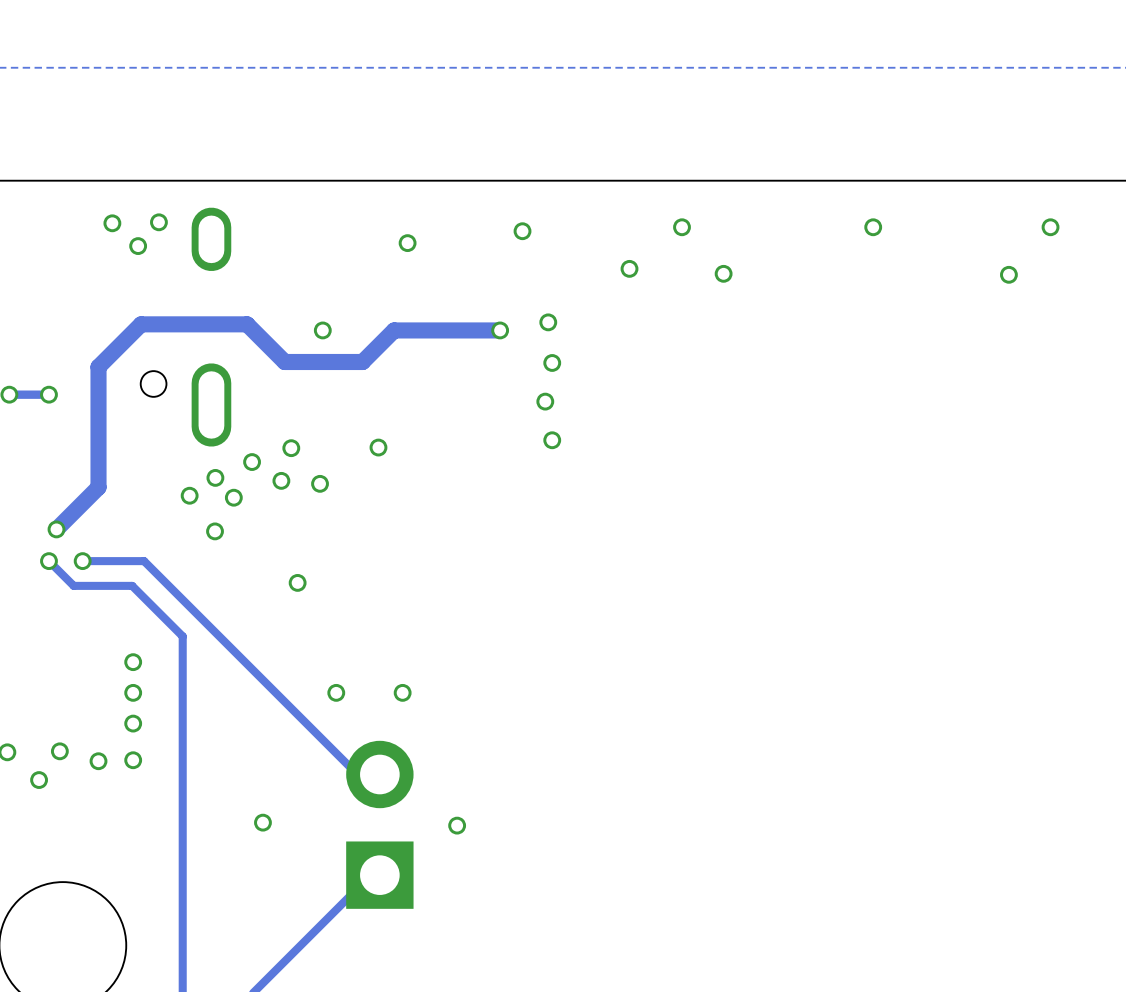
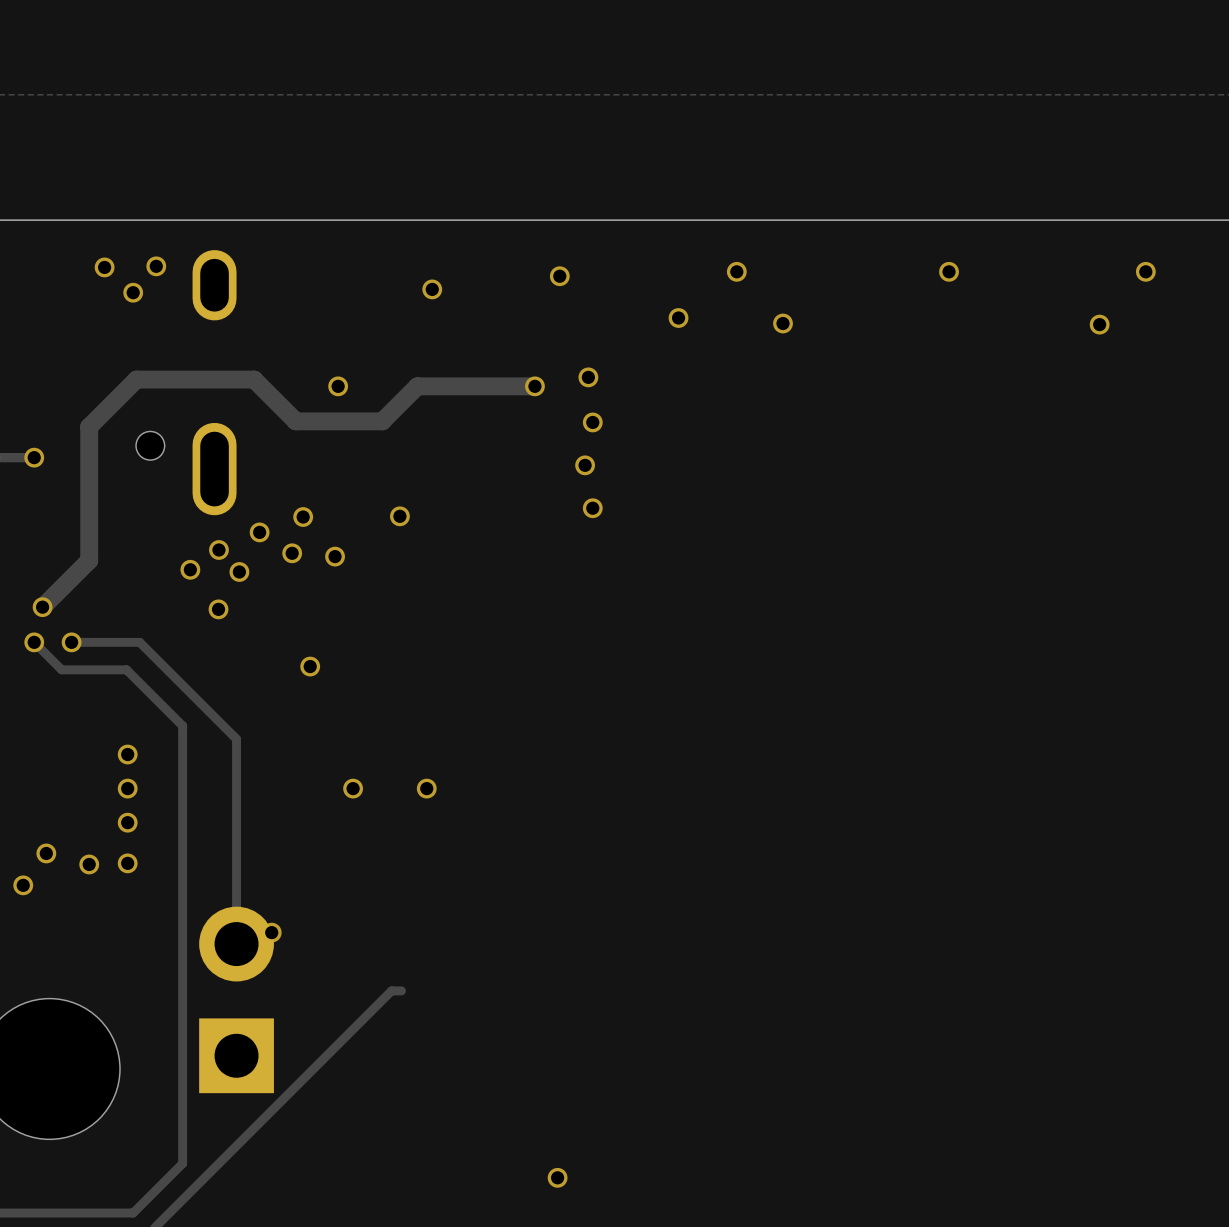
track: (231, 648) (357, 774) (379, 774) -> (236, 739) (236, 944)
part position: (379, 824) -> (236, 999)
via: (457, 825) -> none

